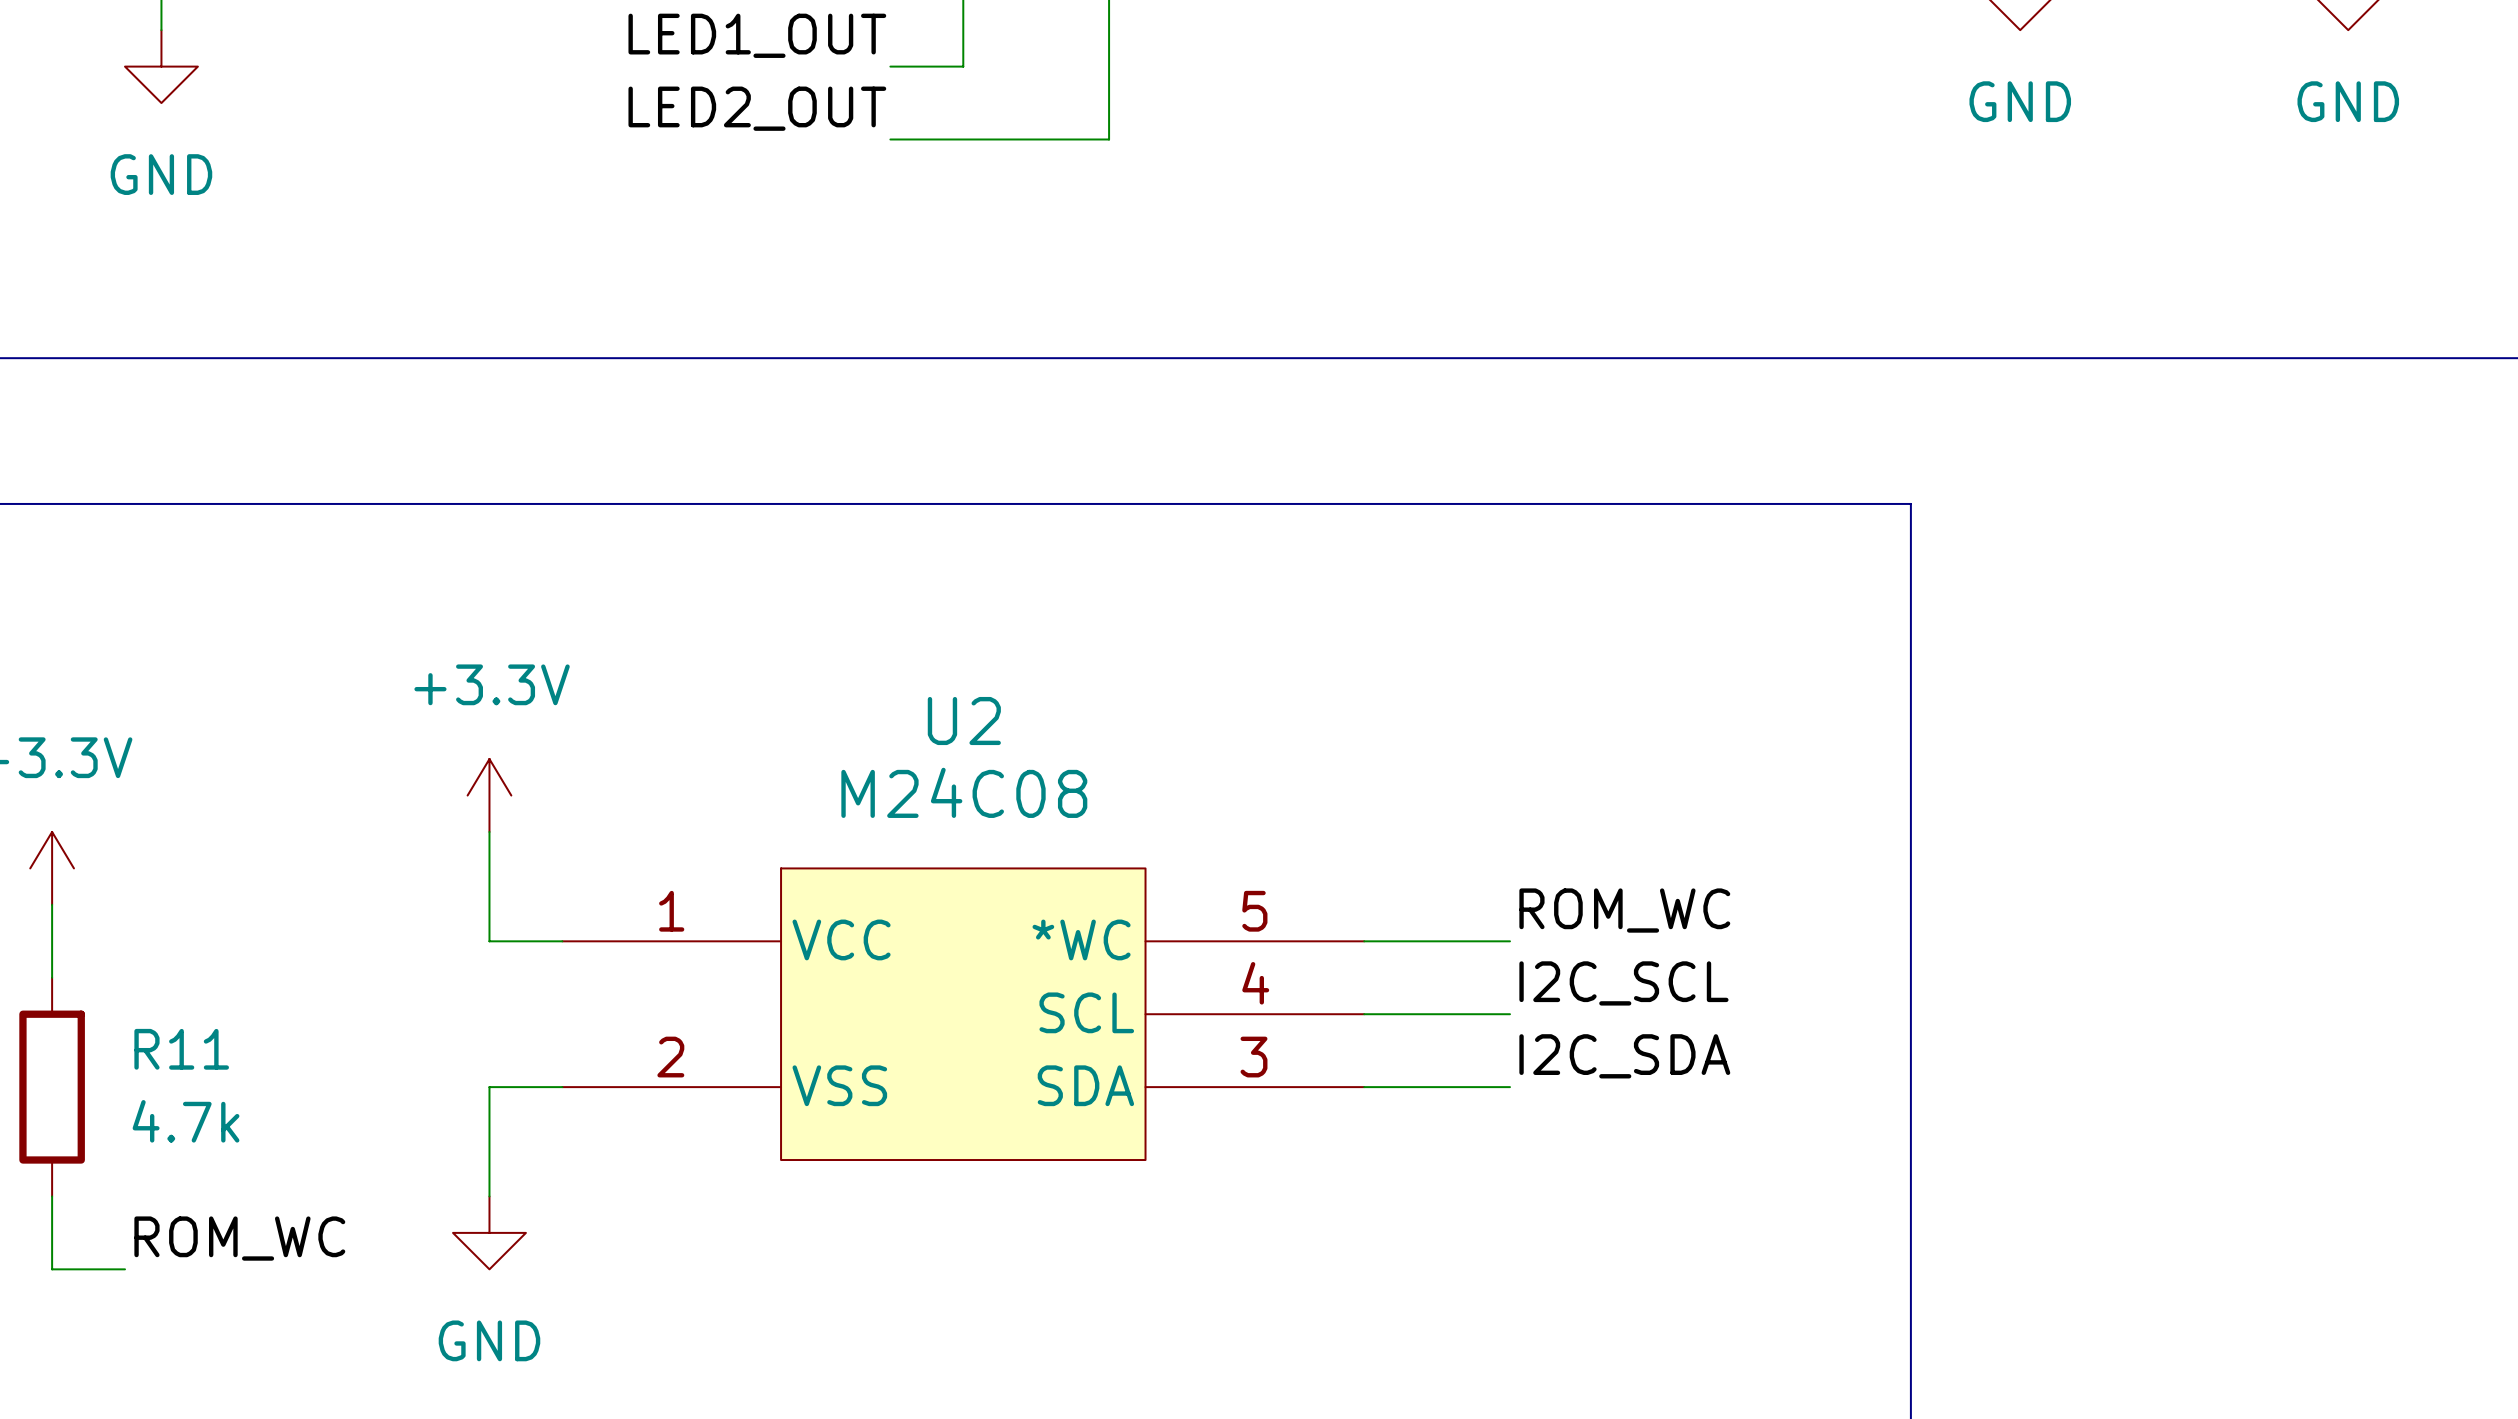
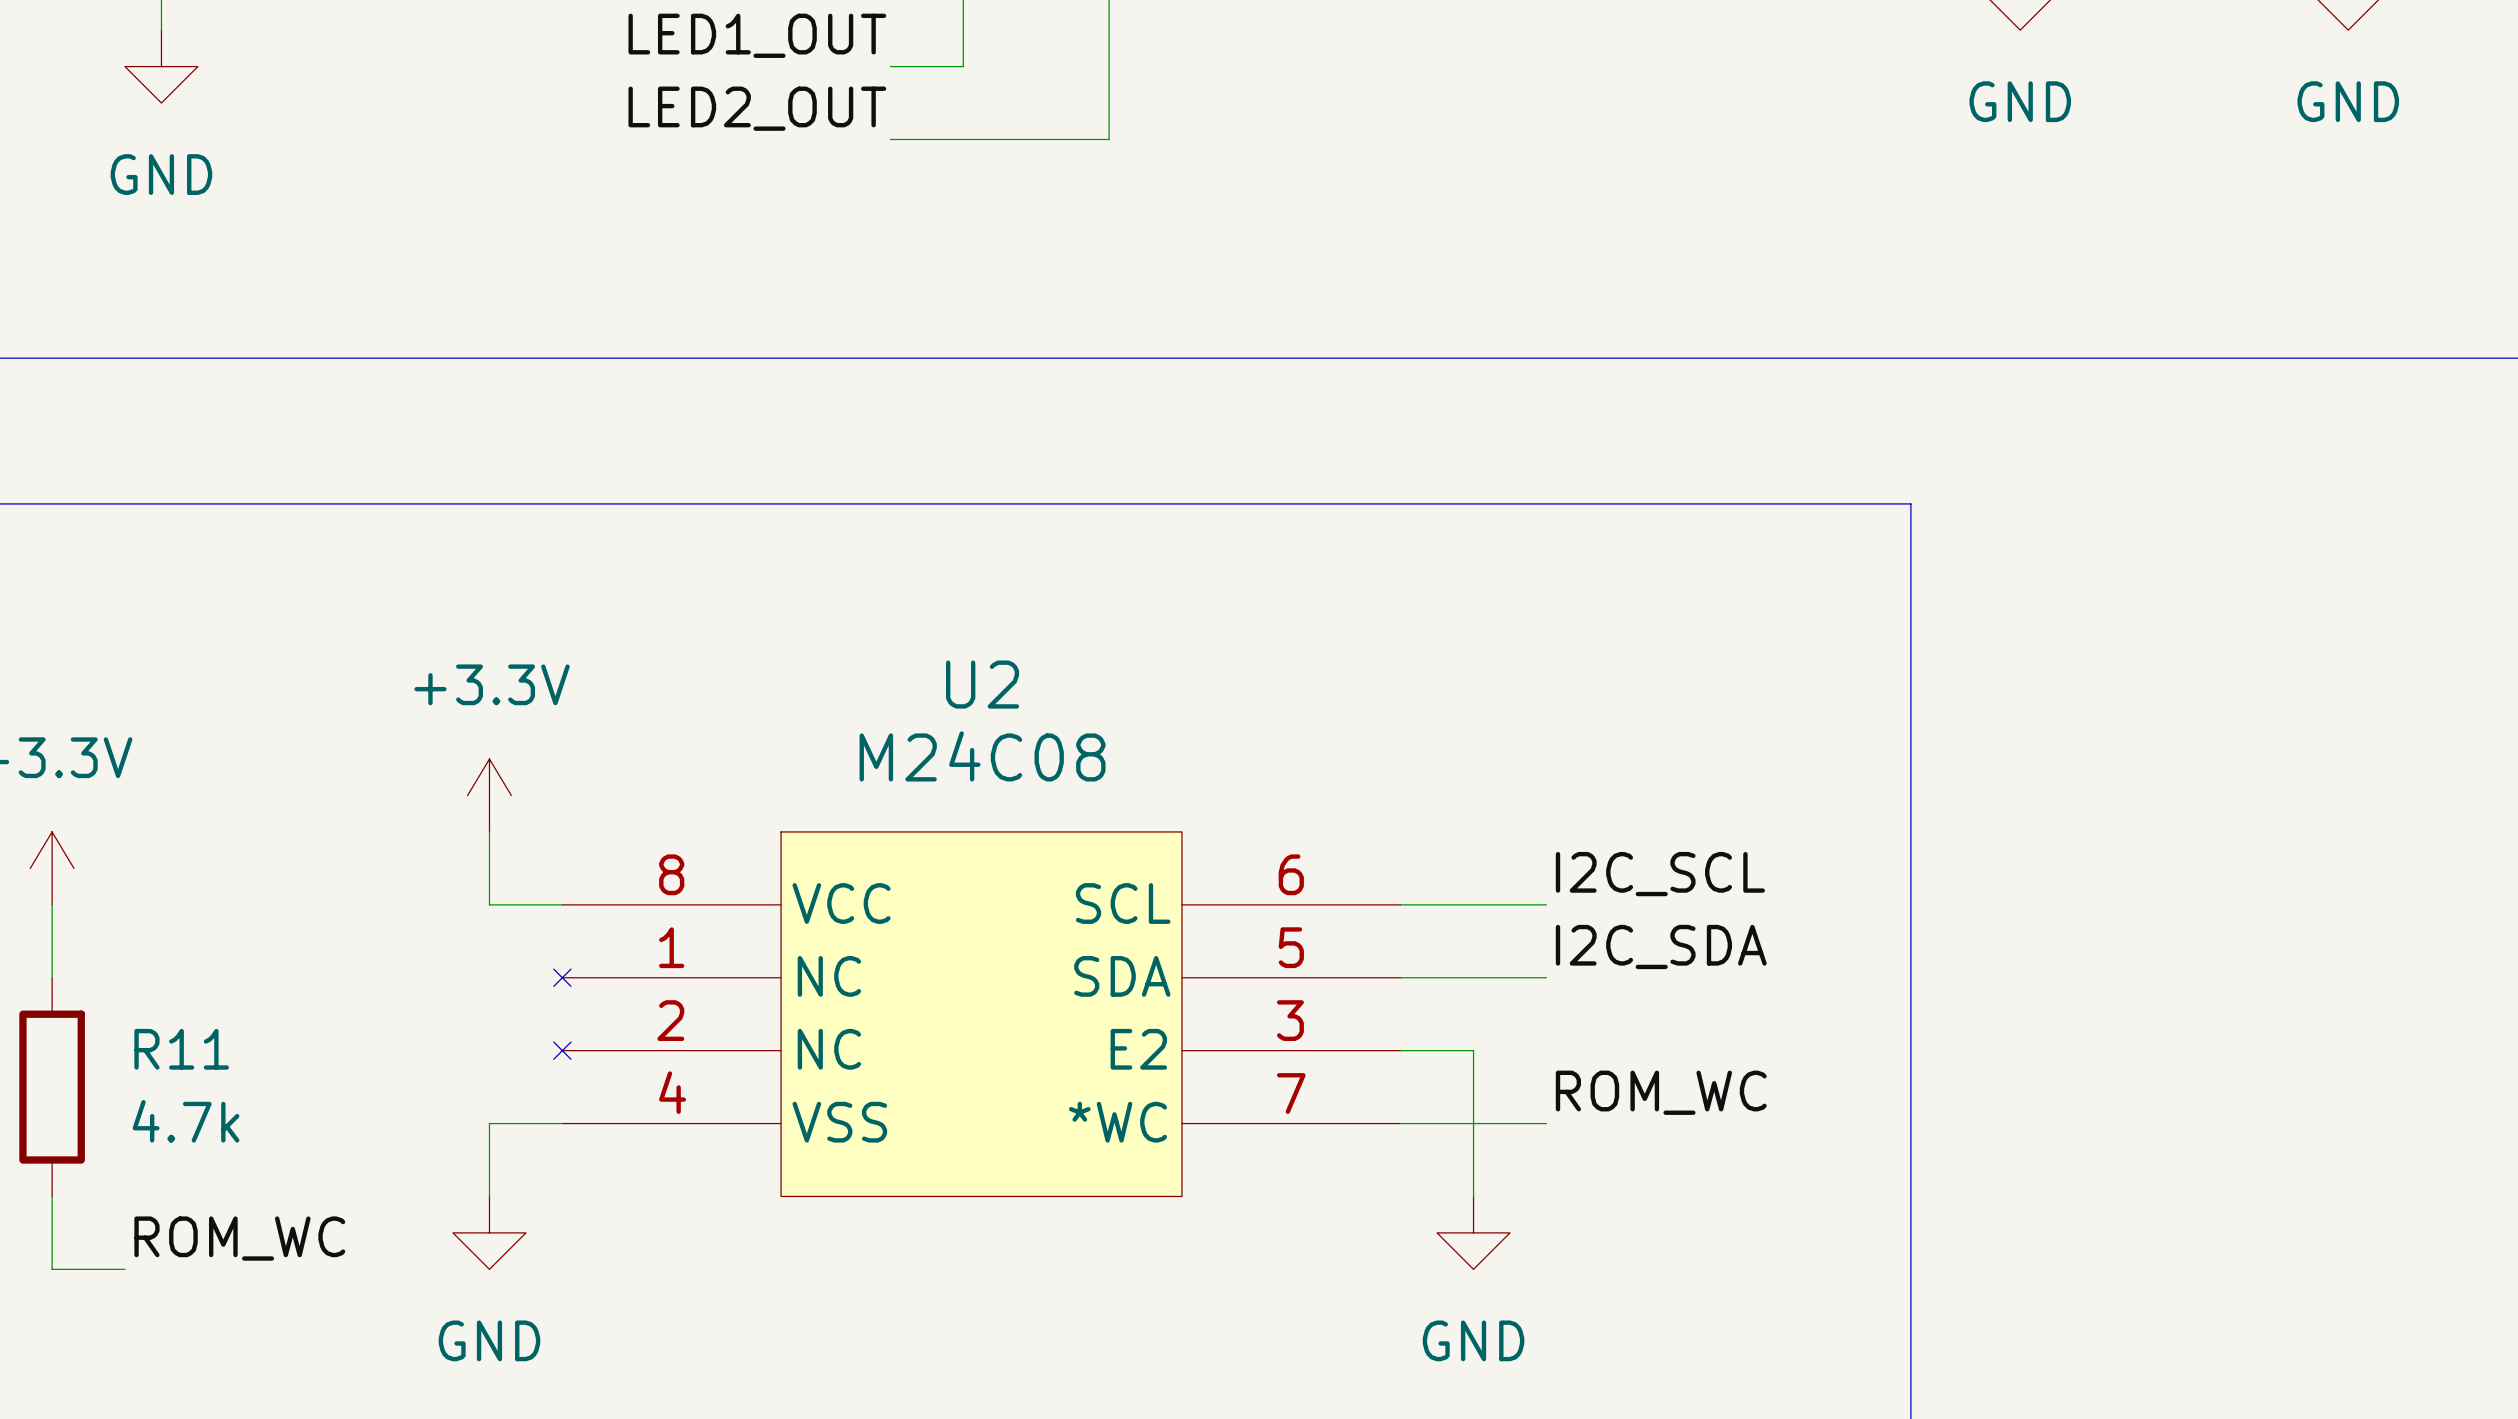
U2 symbol: [562, 868, 1365, 1161] -> [553, 831, 1401, 1197]
wire: (489, 904) (489, 941) (562, 941) -> (489, 904) (562, 904)
label position: ROM_WC (1624, 910) -> ROM_WC (1661, 1092)
wire: (1364, 941) (1509, 941) -> (1400, 904) (1546, 904)
label position: I2C_SCL (1623, 983) -> I2C_SCL (1660, 874)
wire: (1364, 1014) (1509, 1014) -> (1400, 977) (1546, 977)
wire: none -> (1400, 1050) (1473, 1050) (1473, 1196)
label position: I2C_SDA (1624, 1056) -> I2C_SDA (1661, 946)
wire: (562, 1087) (489, 1087) (489, 1123) -> (562, 1123) (489, 1123)
wire: (1364, 1087) (1509, 1087) -> (1400, 1123) (1546, 1123)
power symbol: none -> GND (1473, 1232)

